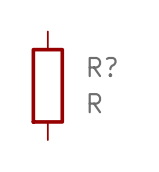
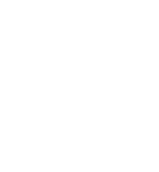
R?: R (47, 85) -> none

